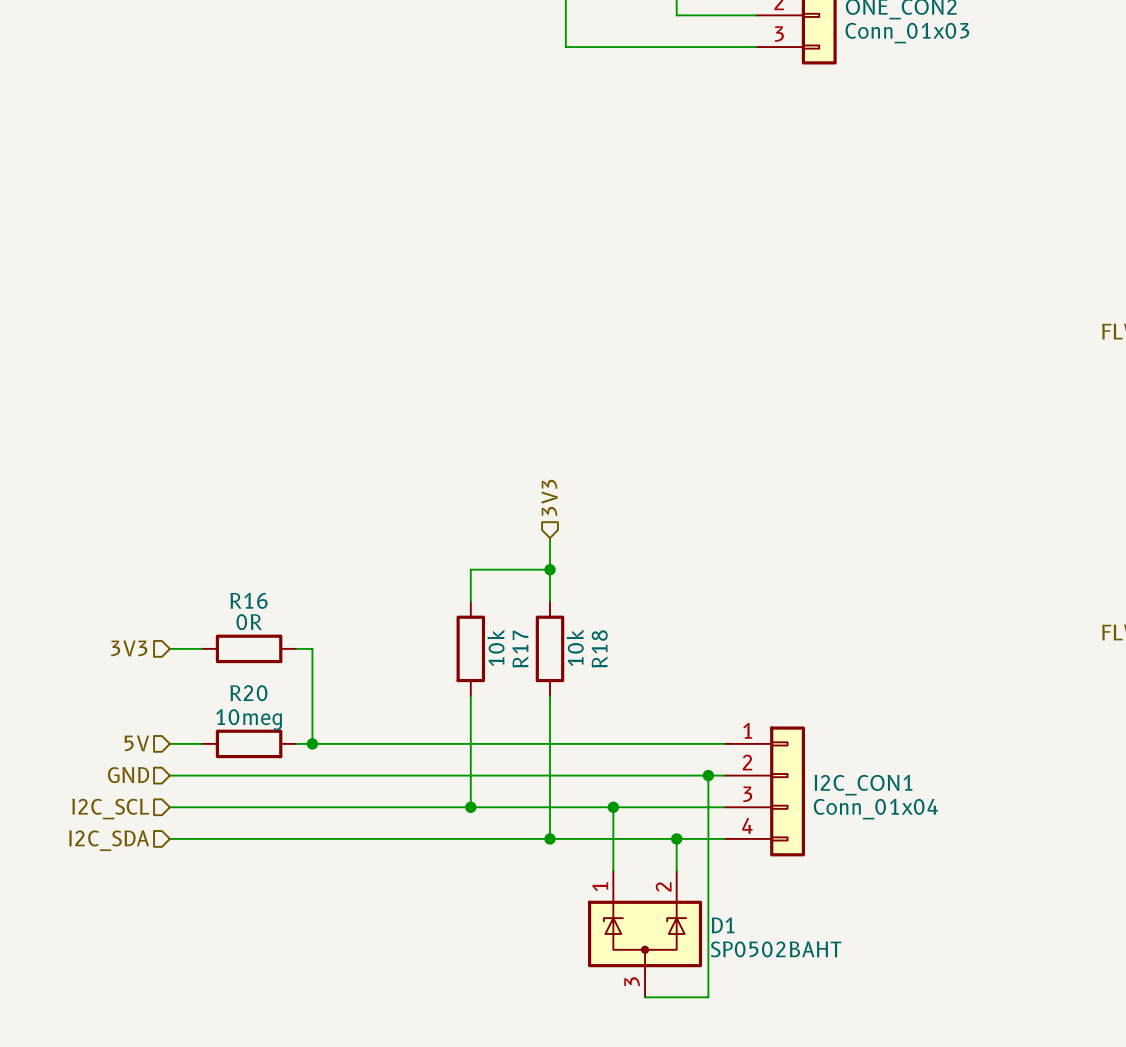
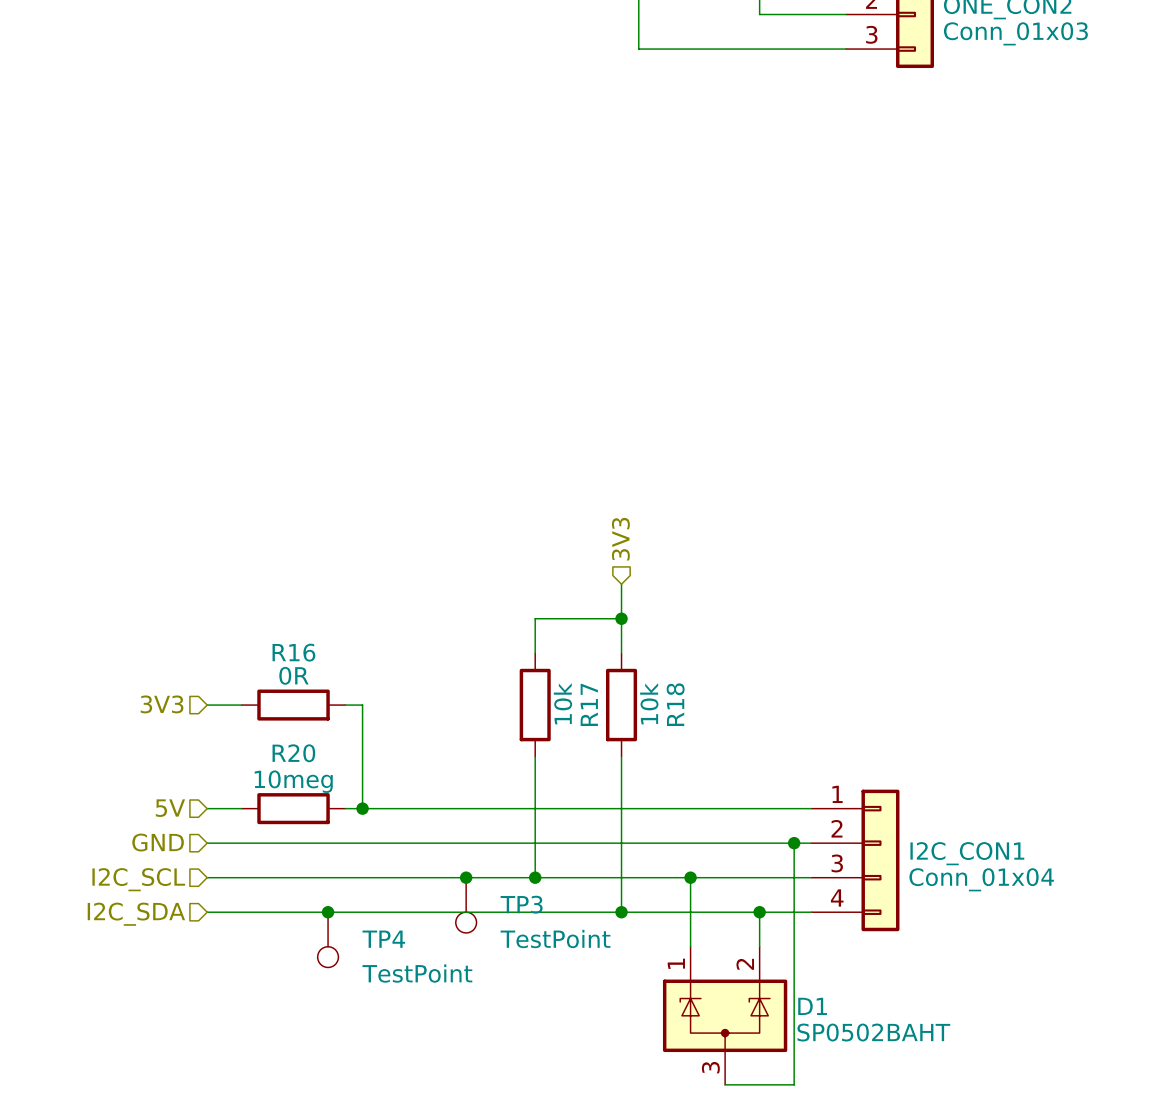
junction: none -> (466, 877)
TP3: none -> TestPoint (466, 905)
junction: none -> (328, 912)
TP4: none -> TestPoint (328, 939)

